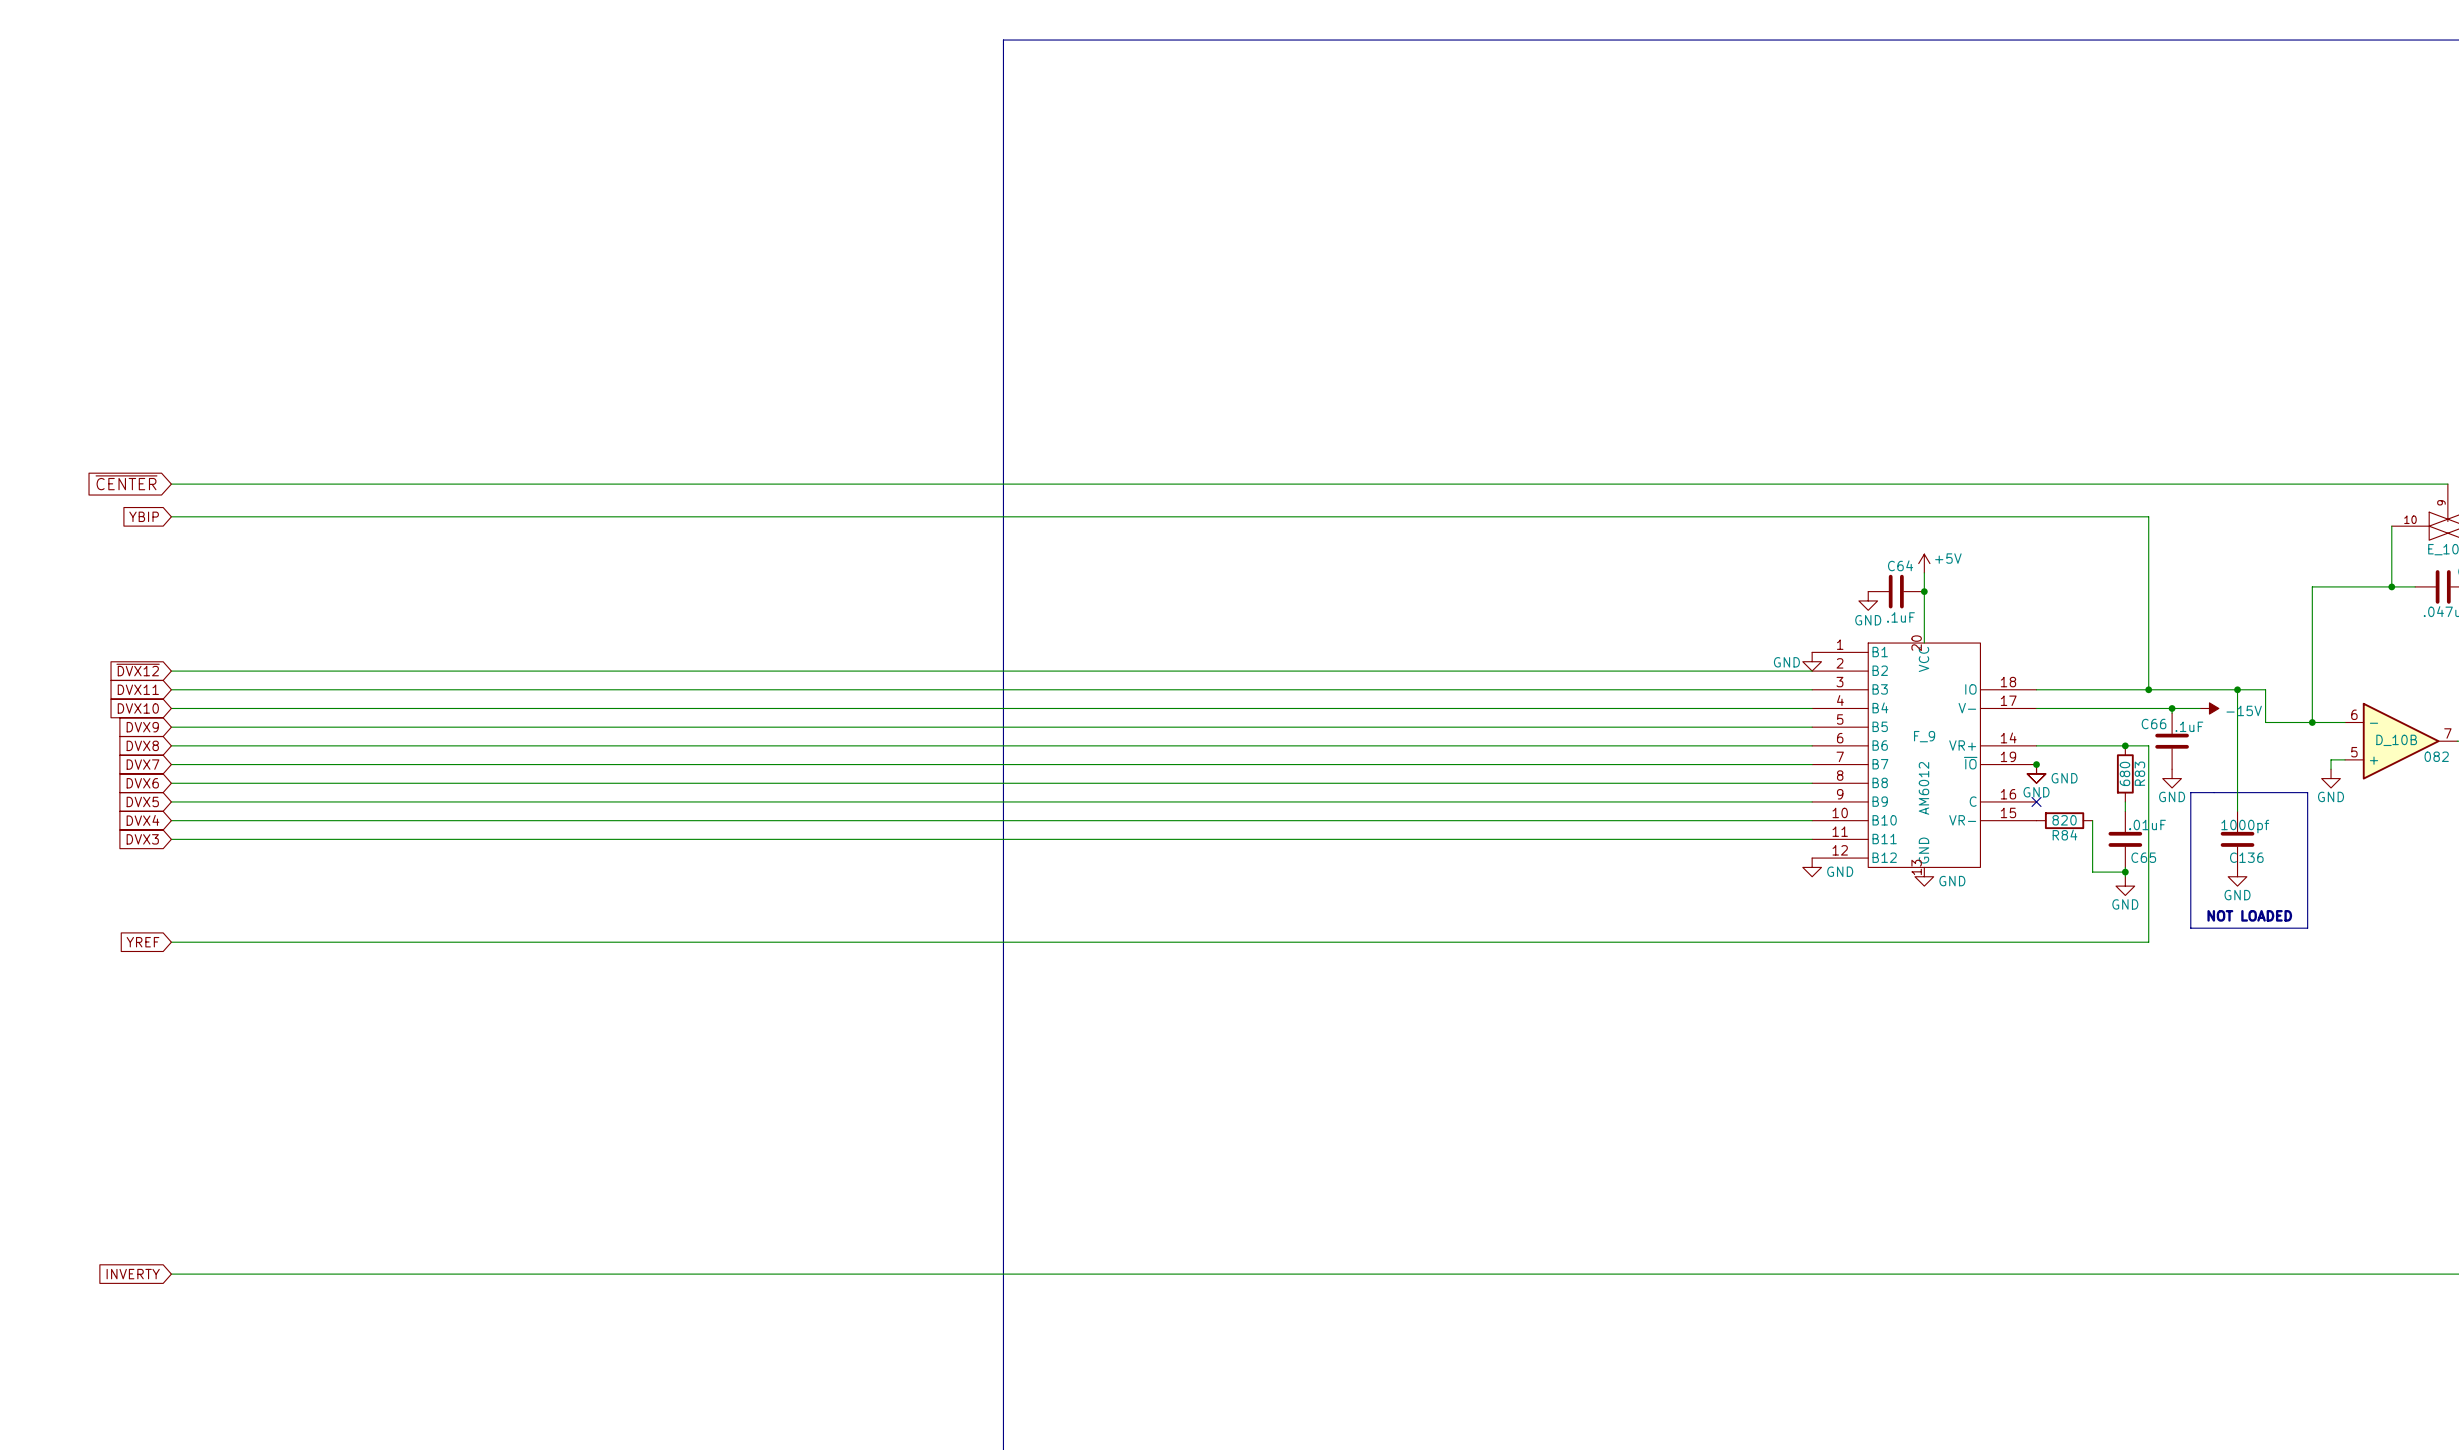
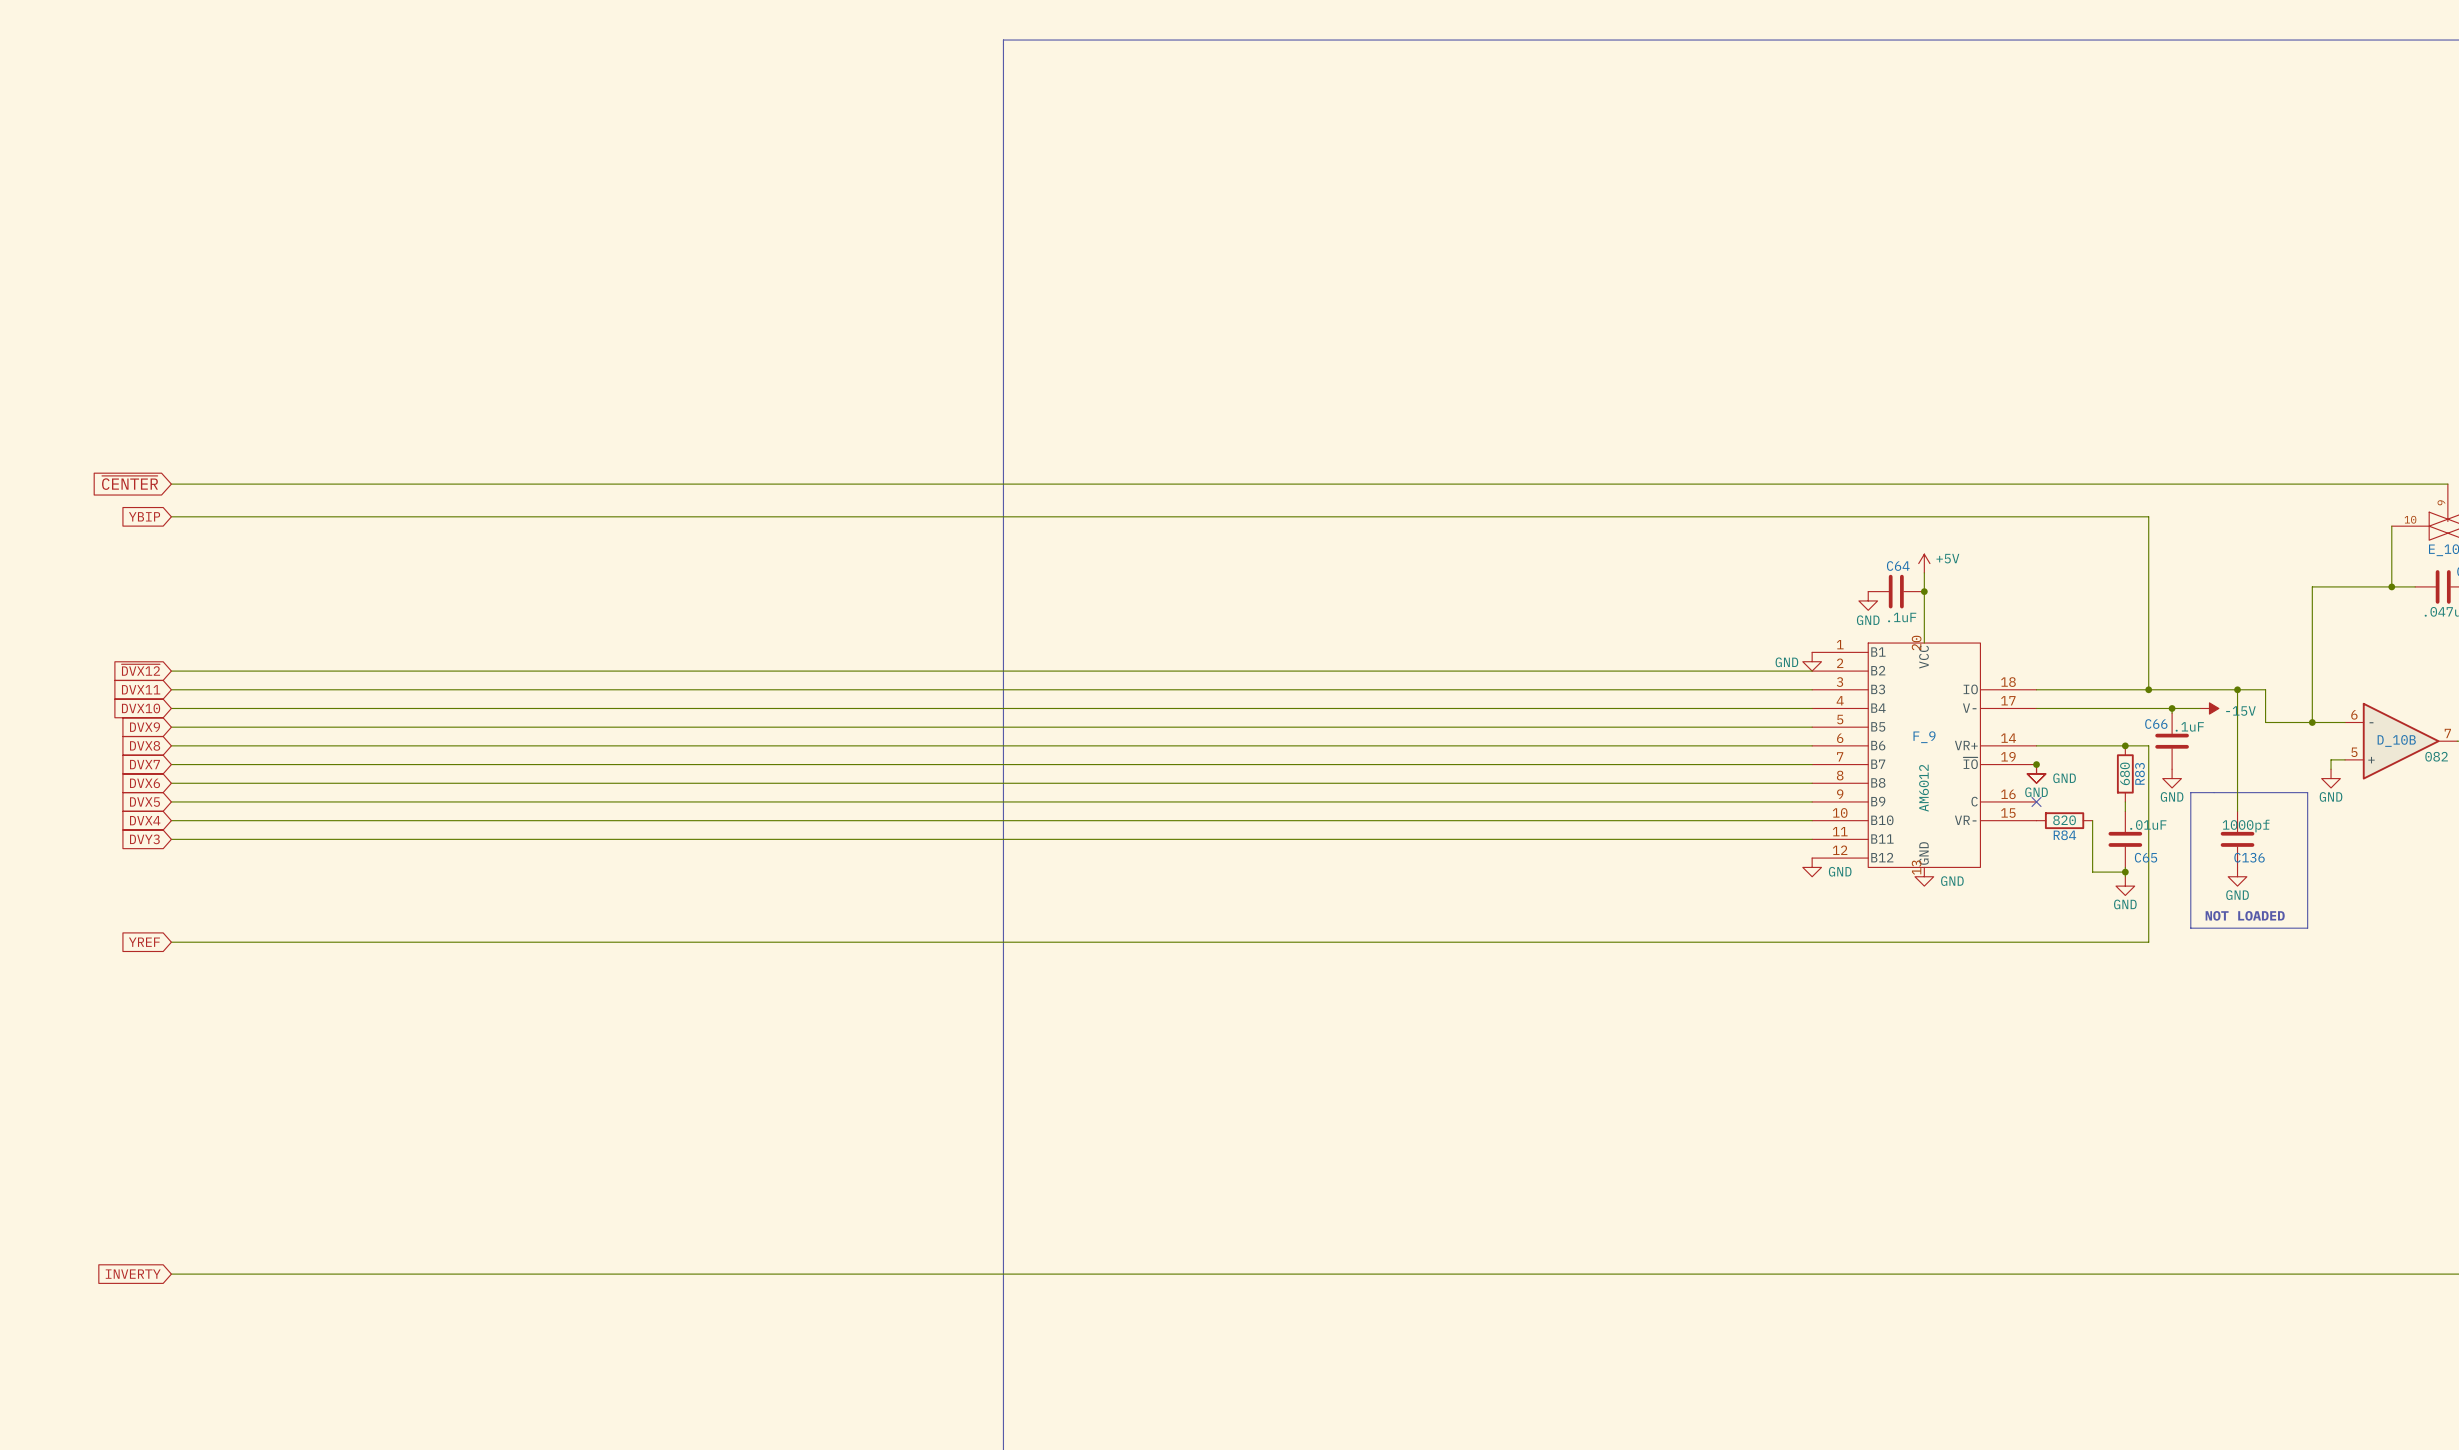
global label: DVX3 (142, 839) -> DVY3 (144, 839)

